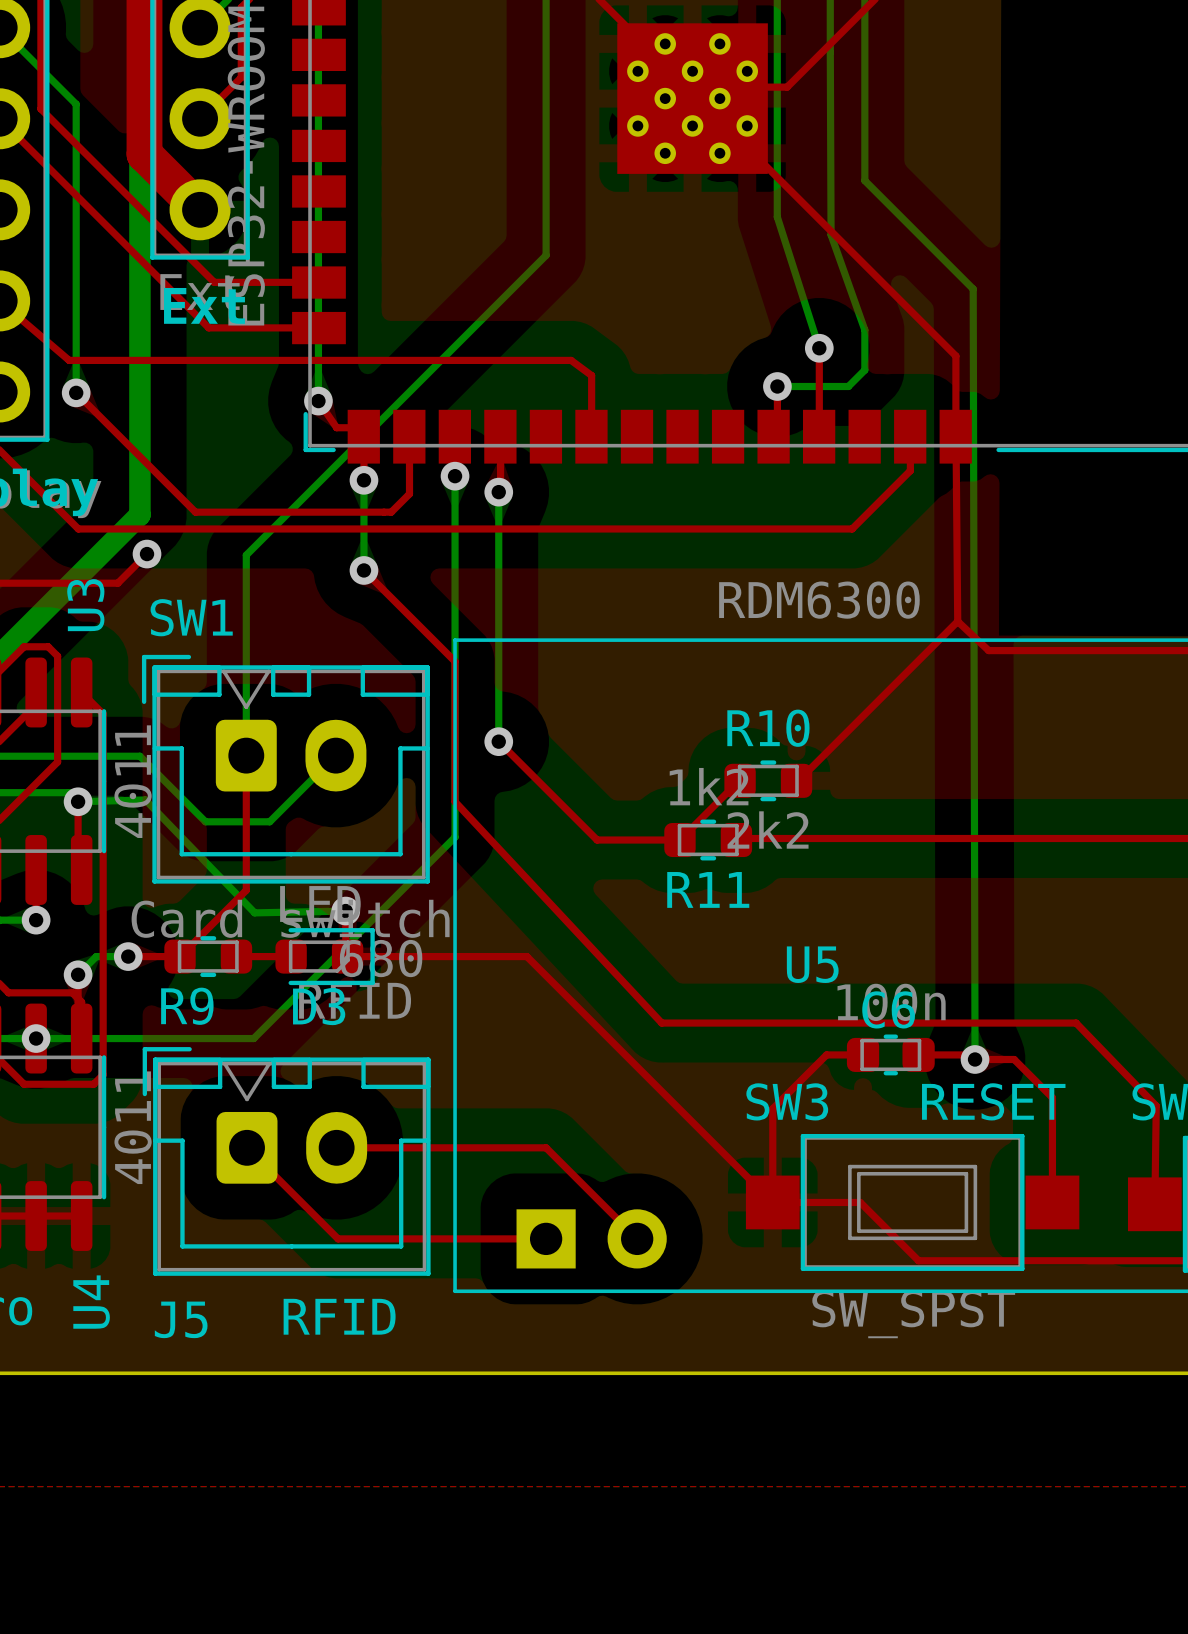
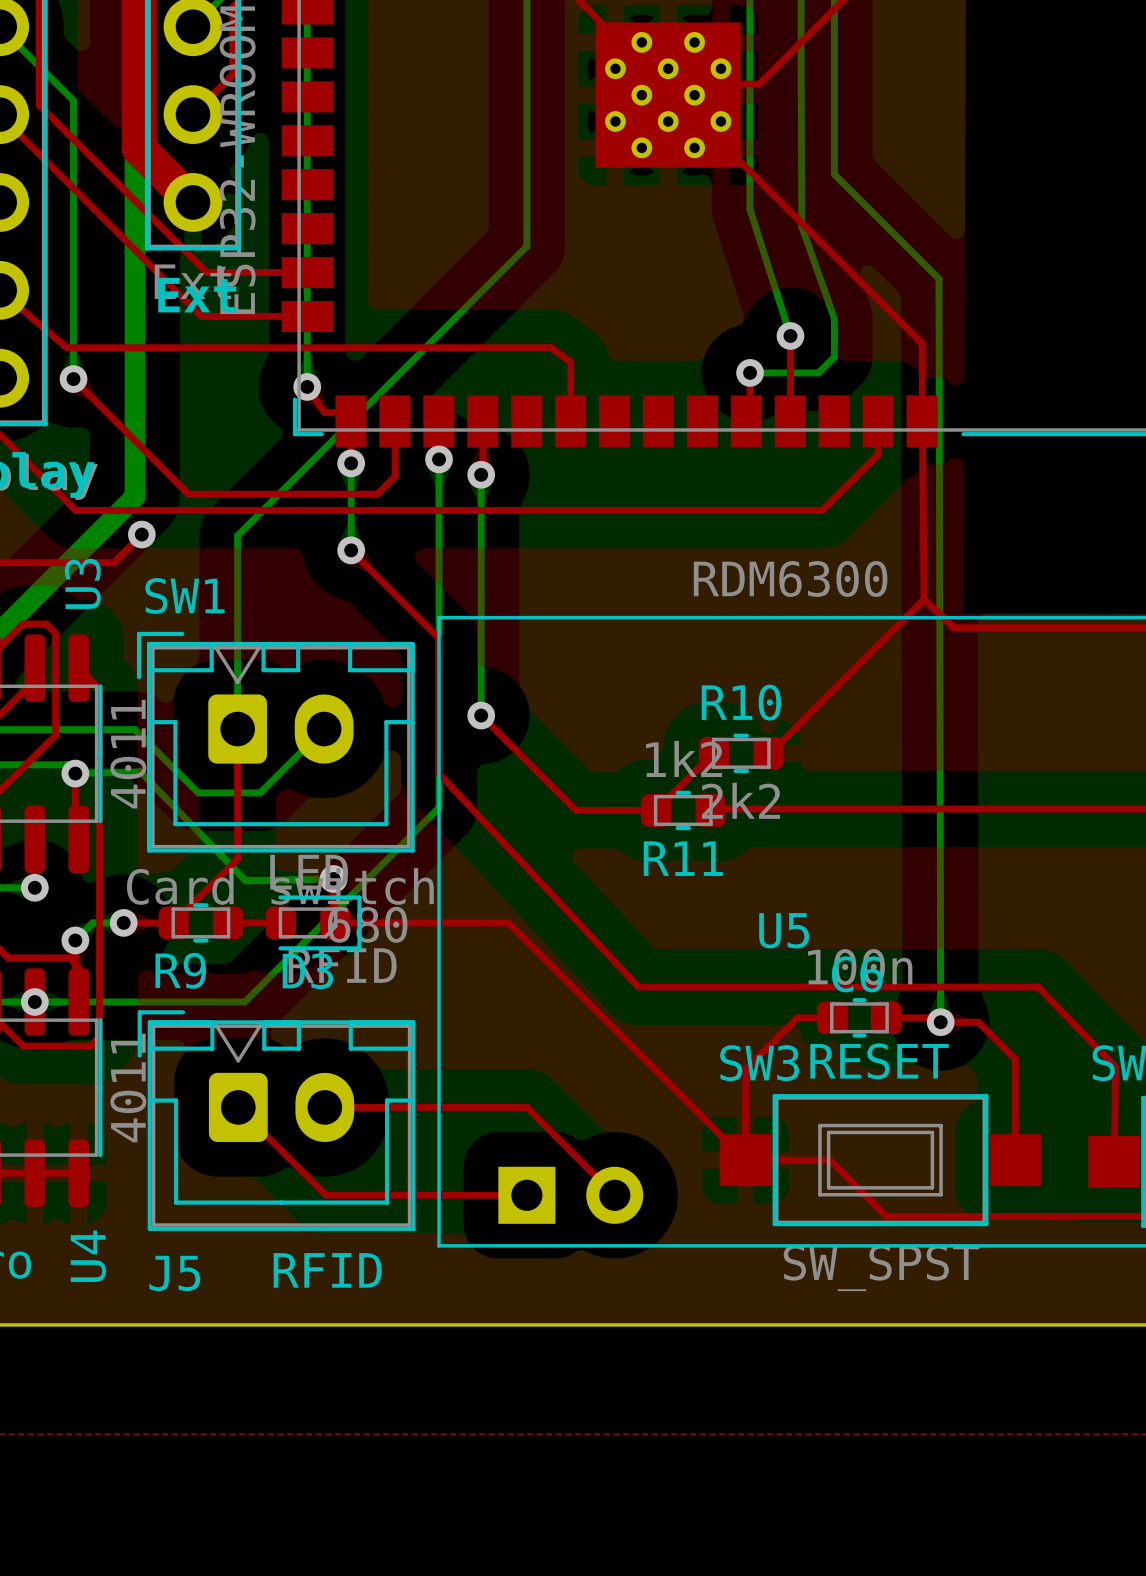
text position: RESET (993, 1101) -> RESET (879, 1061)

